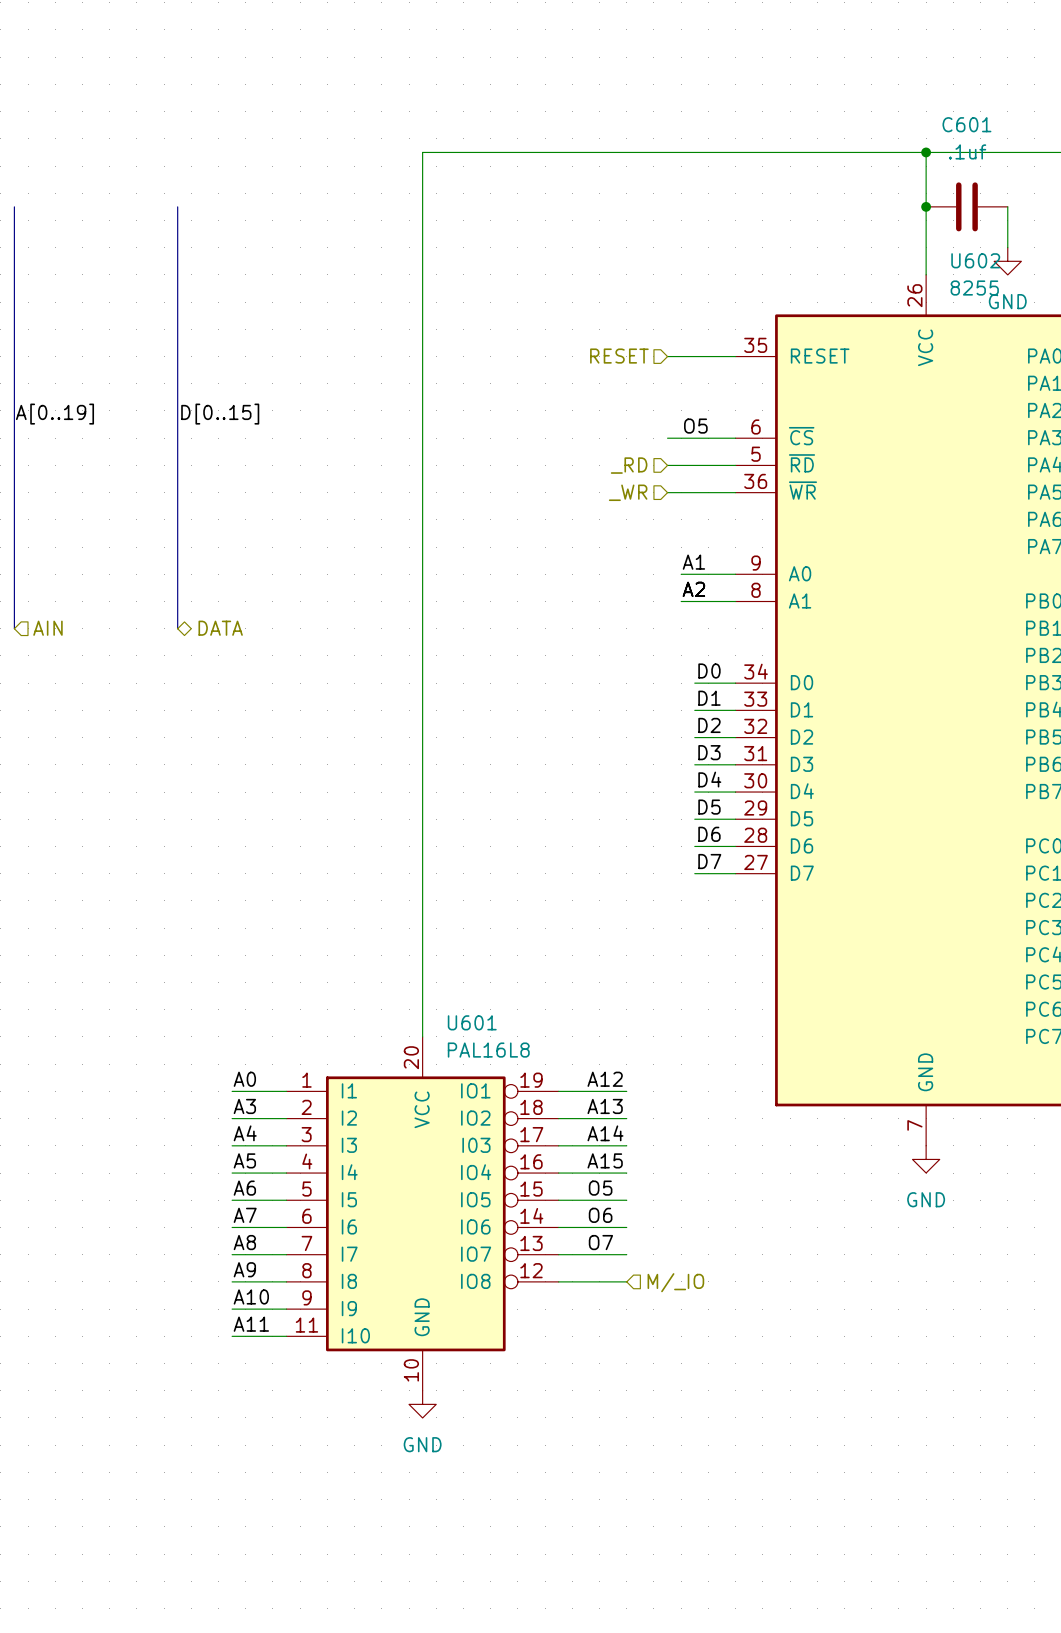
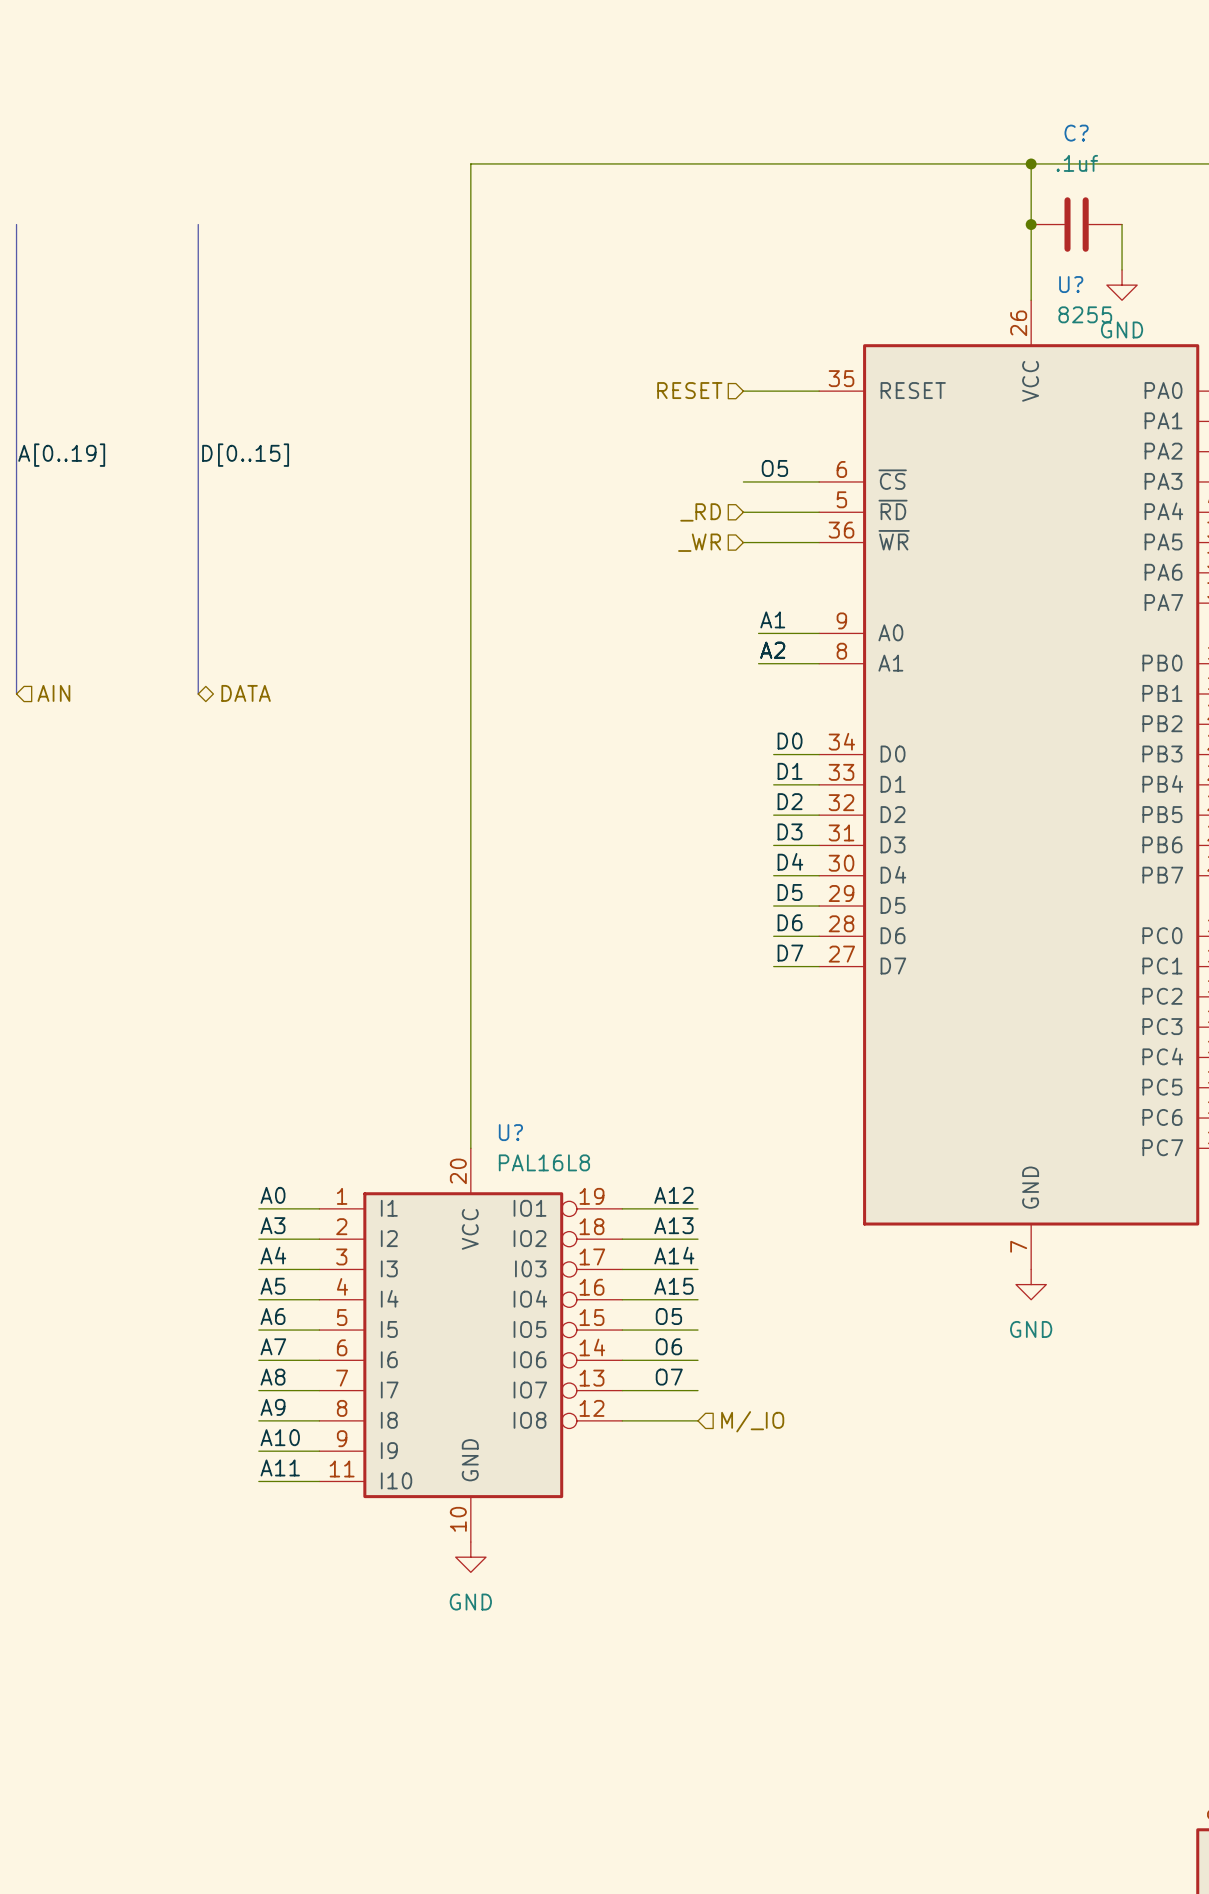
C601 name: C601 (966, 124) -> C? (1076, 133)
U602 name: U602 (975, 260) -> U? (1071, 284)
U601 name: U601 (472, 1022) -> U? (510, 1132)

